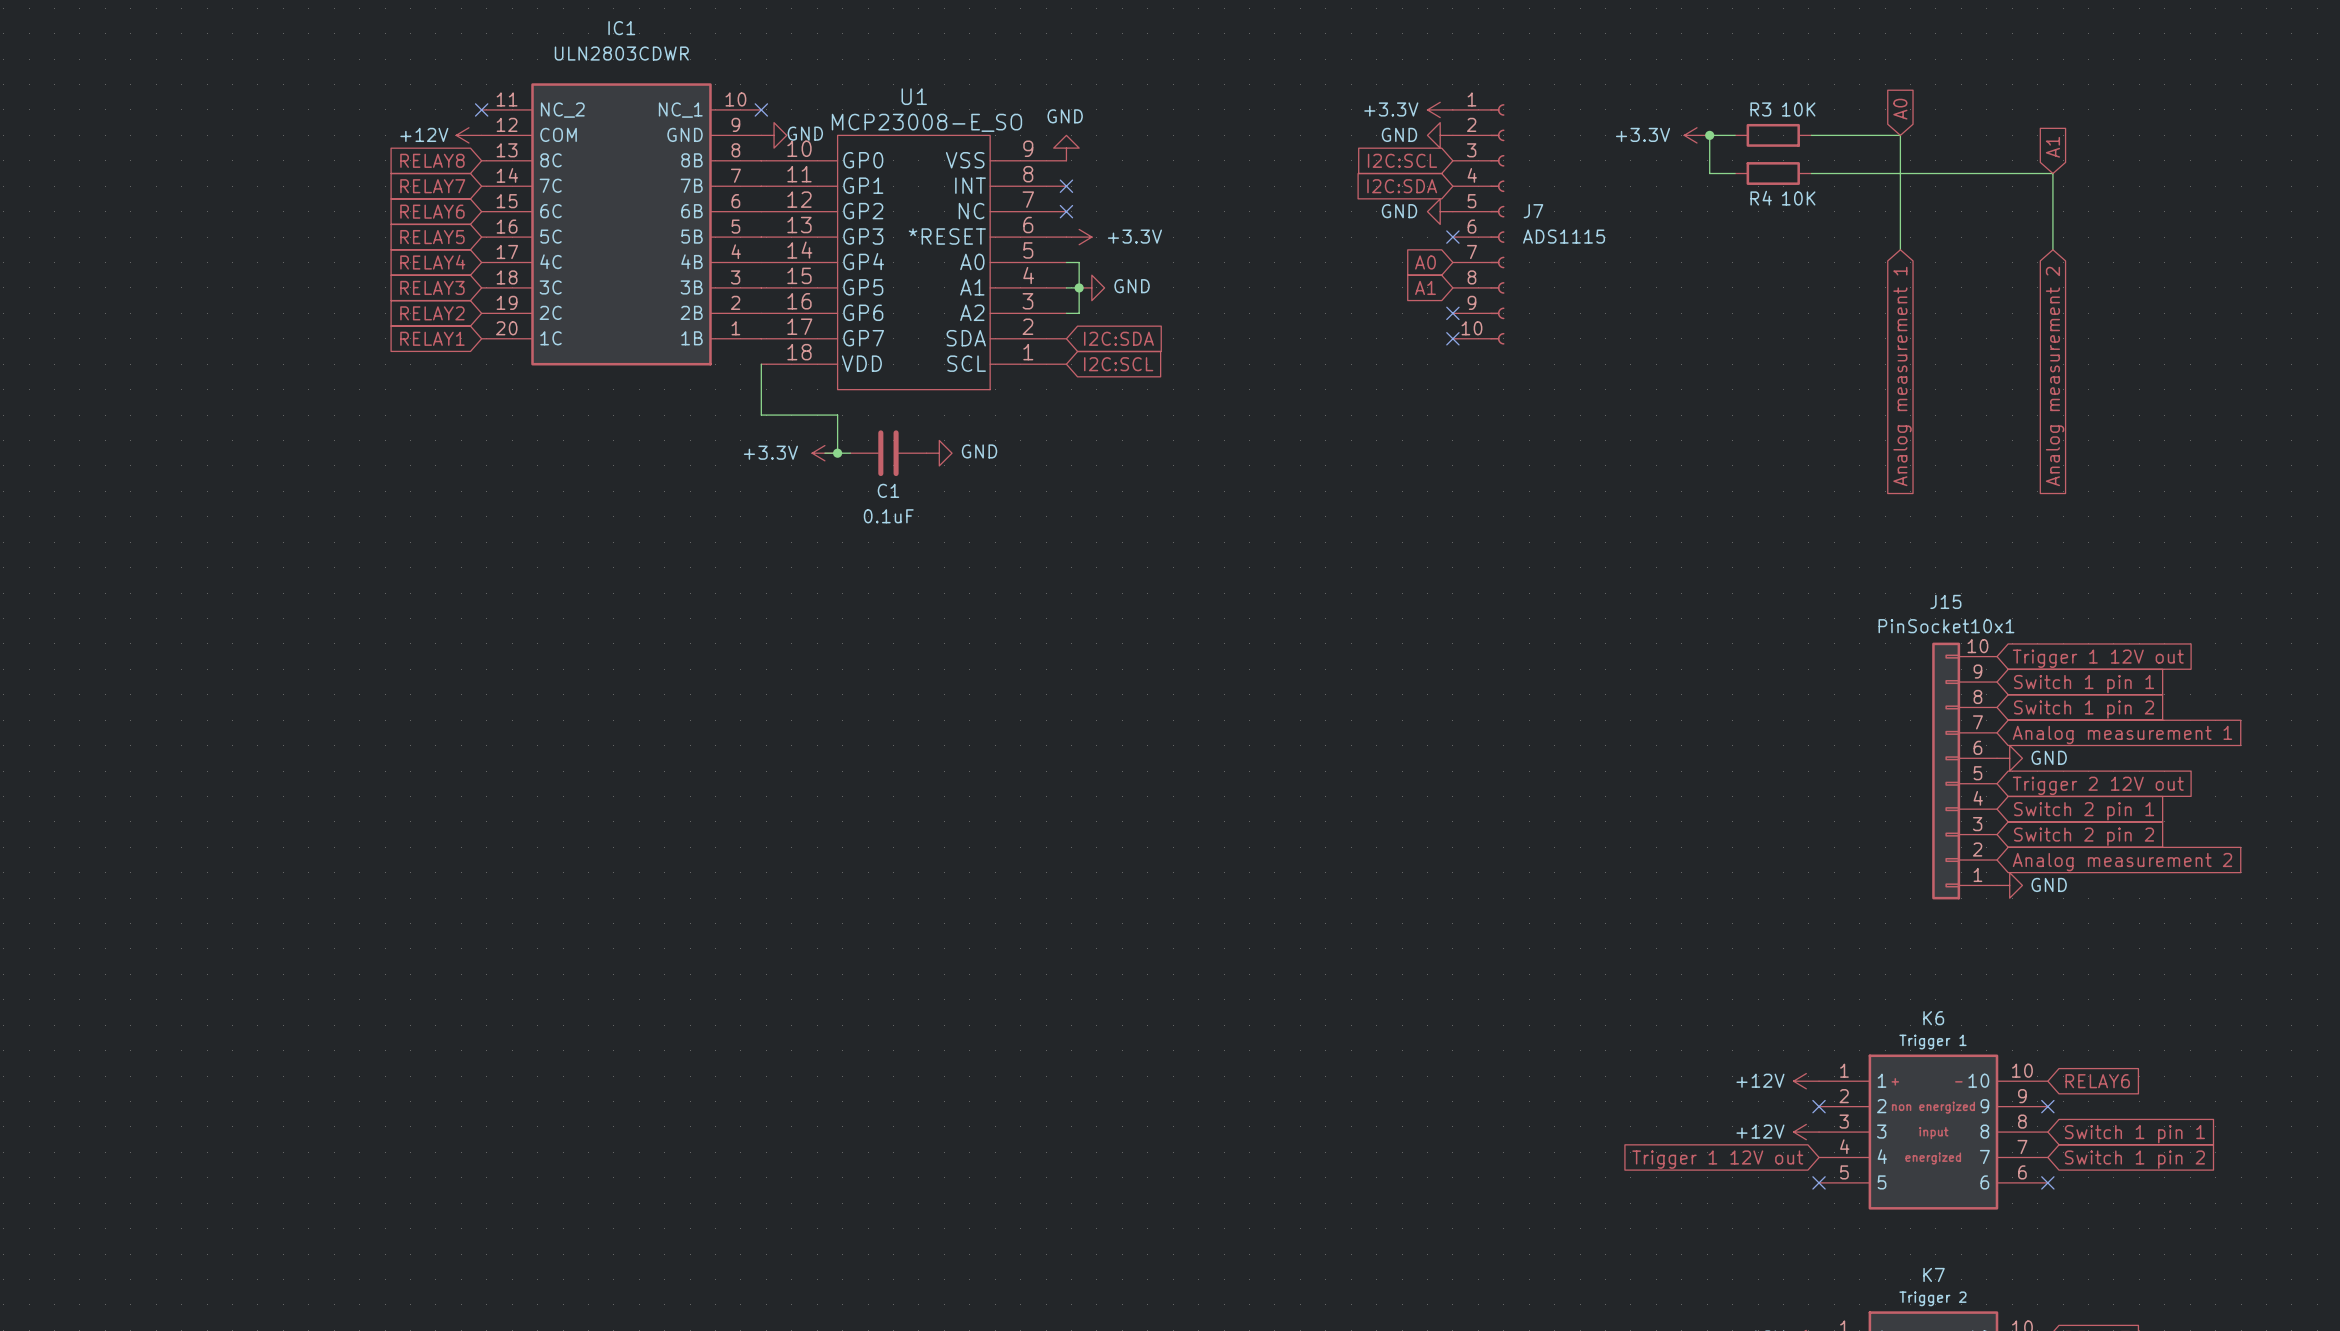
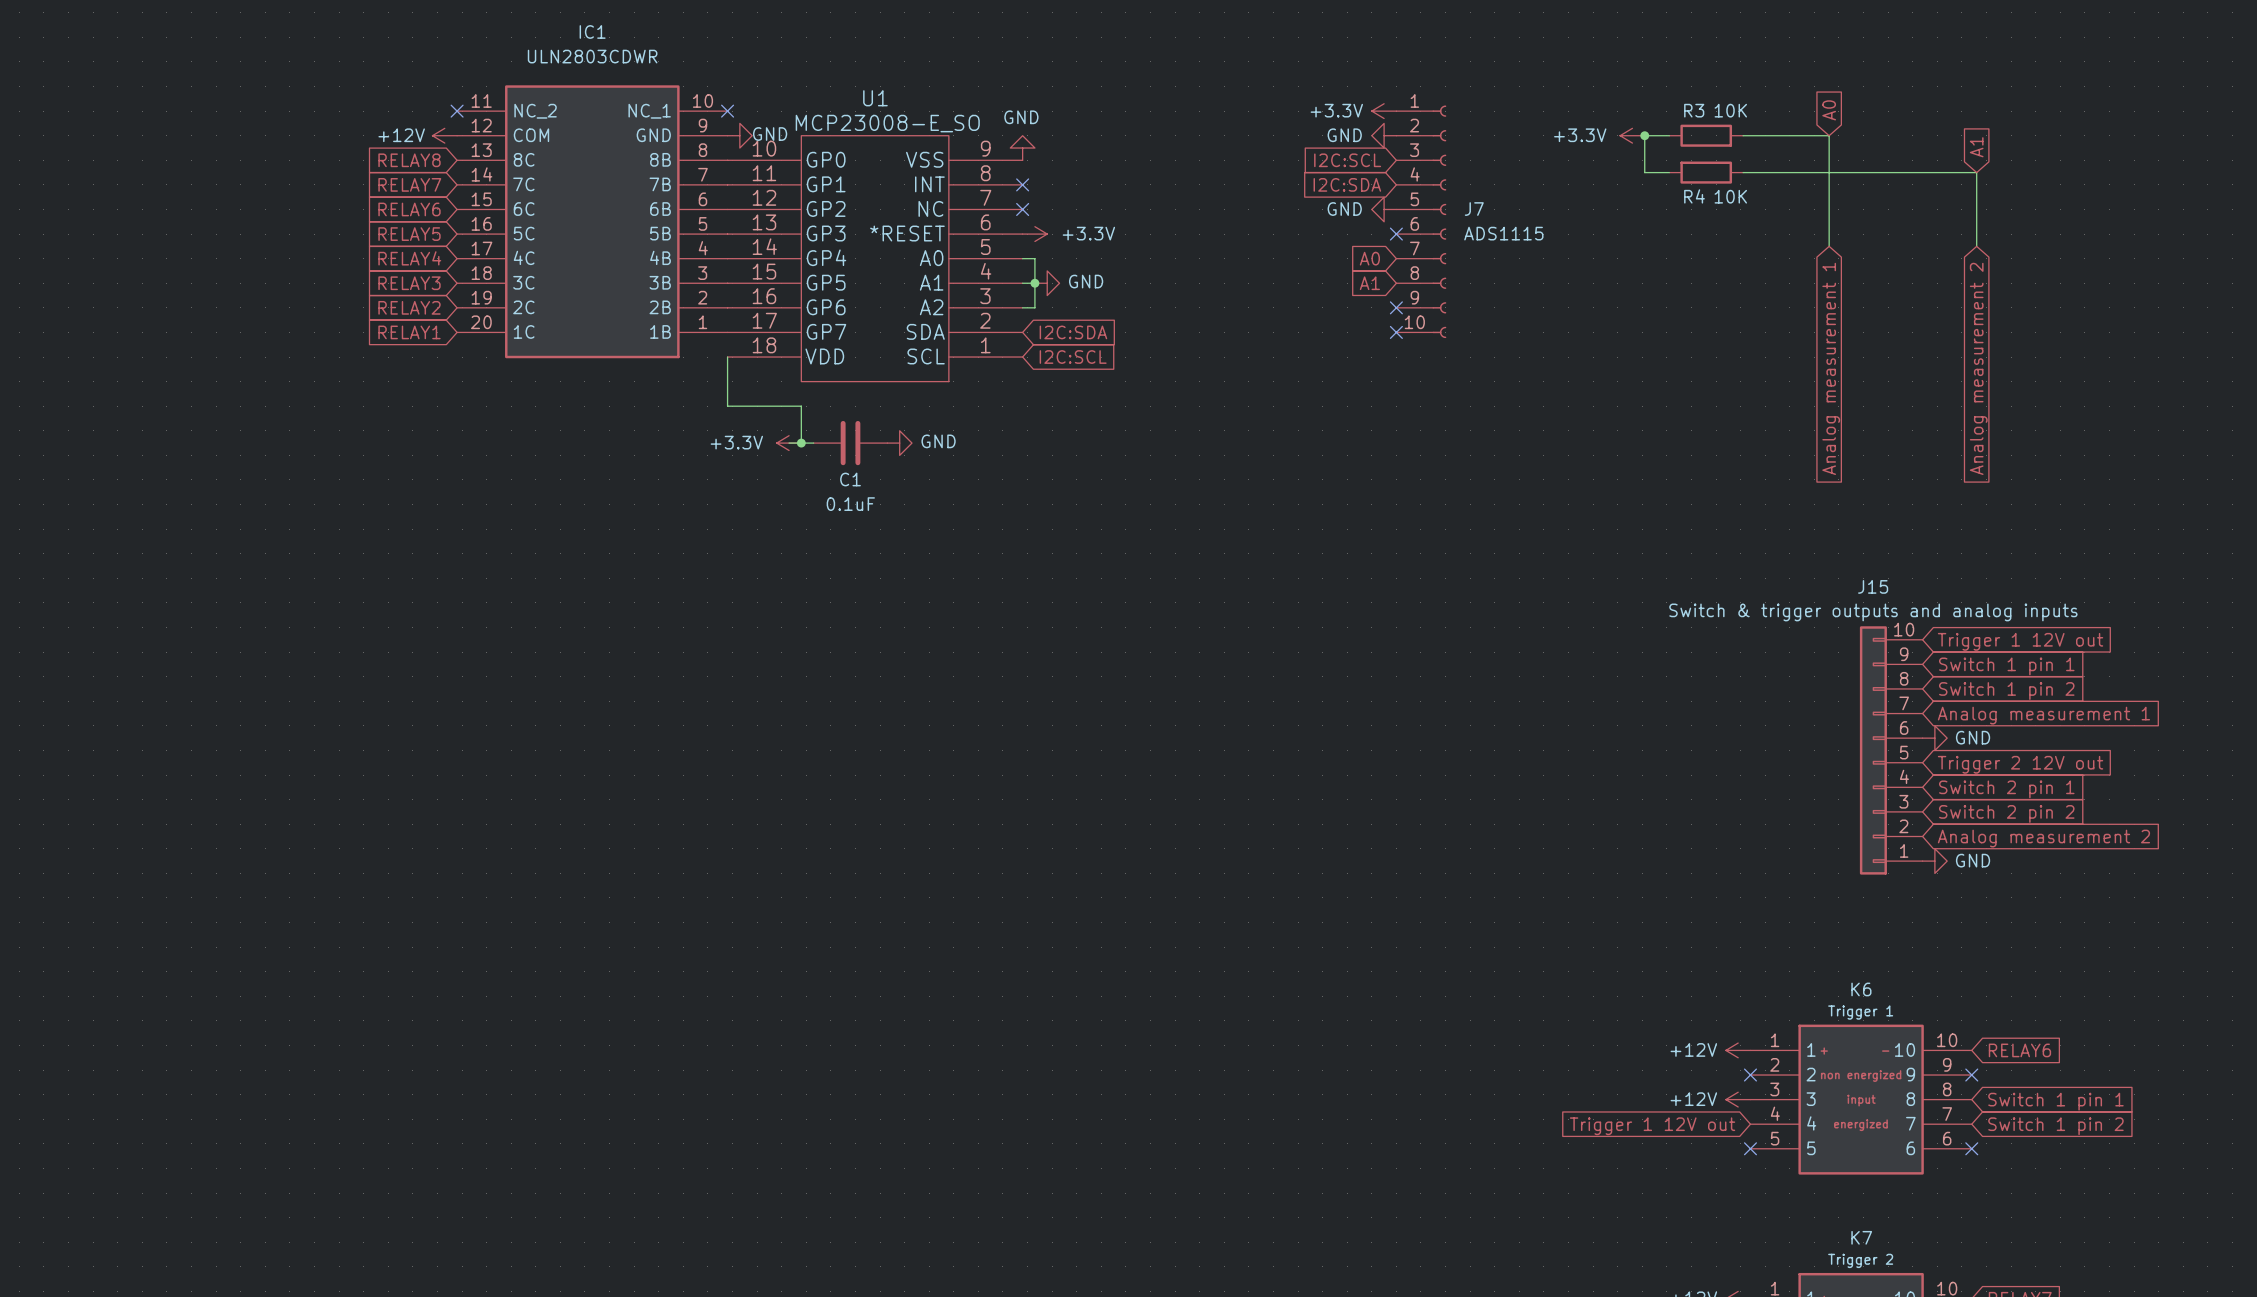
J15 value: PinSocket10x1 (1946, 626) -> Switch & trigger outputs and analog inputs (1873, 612)

